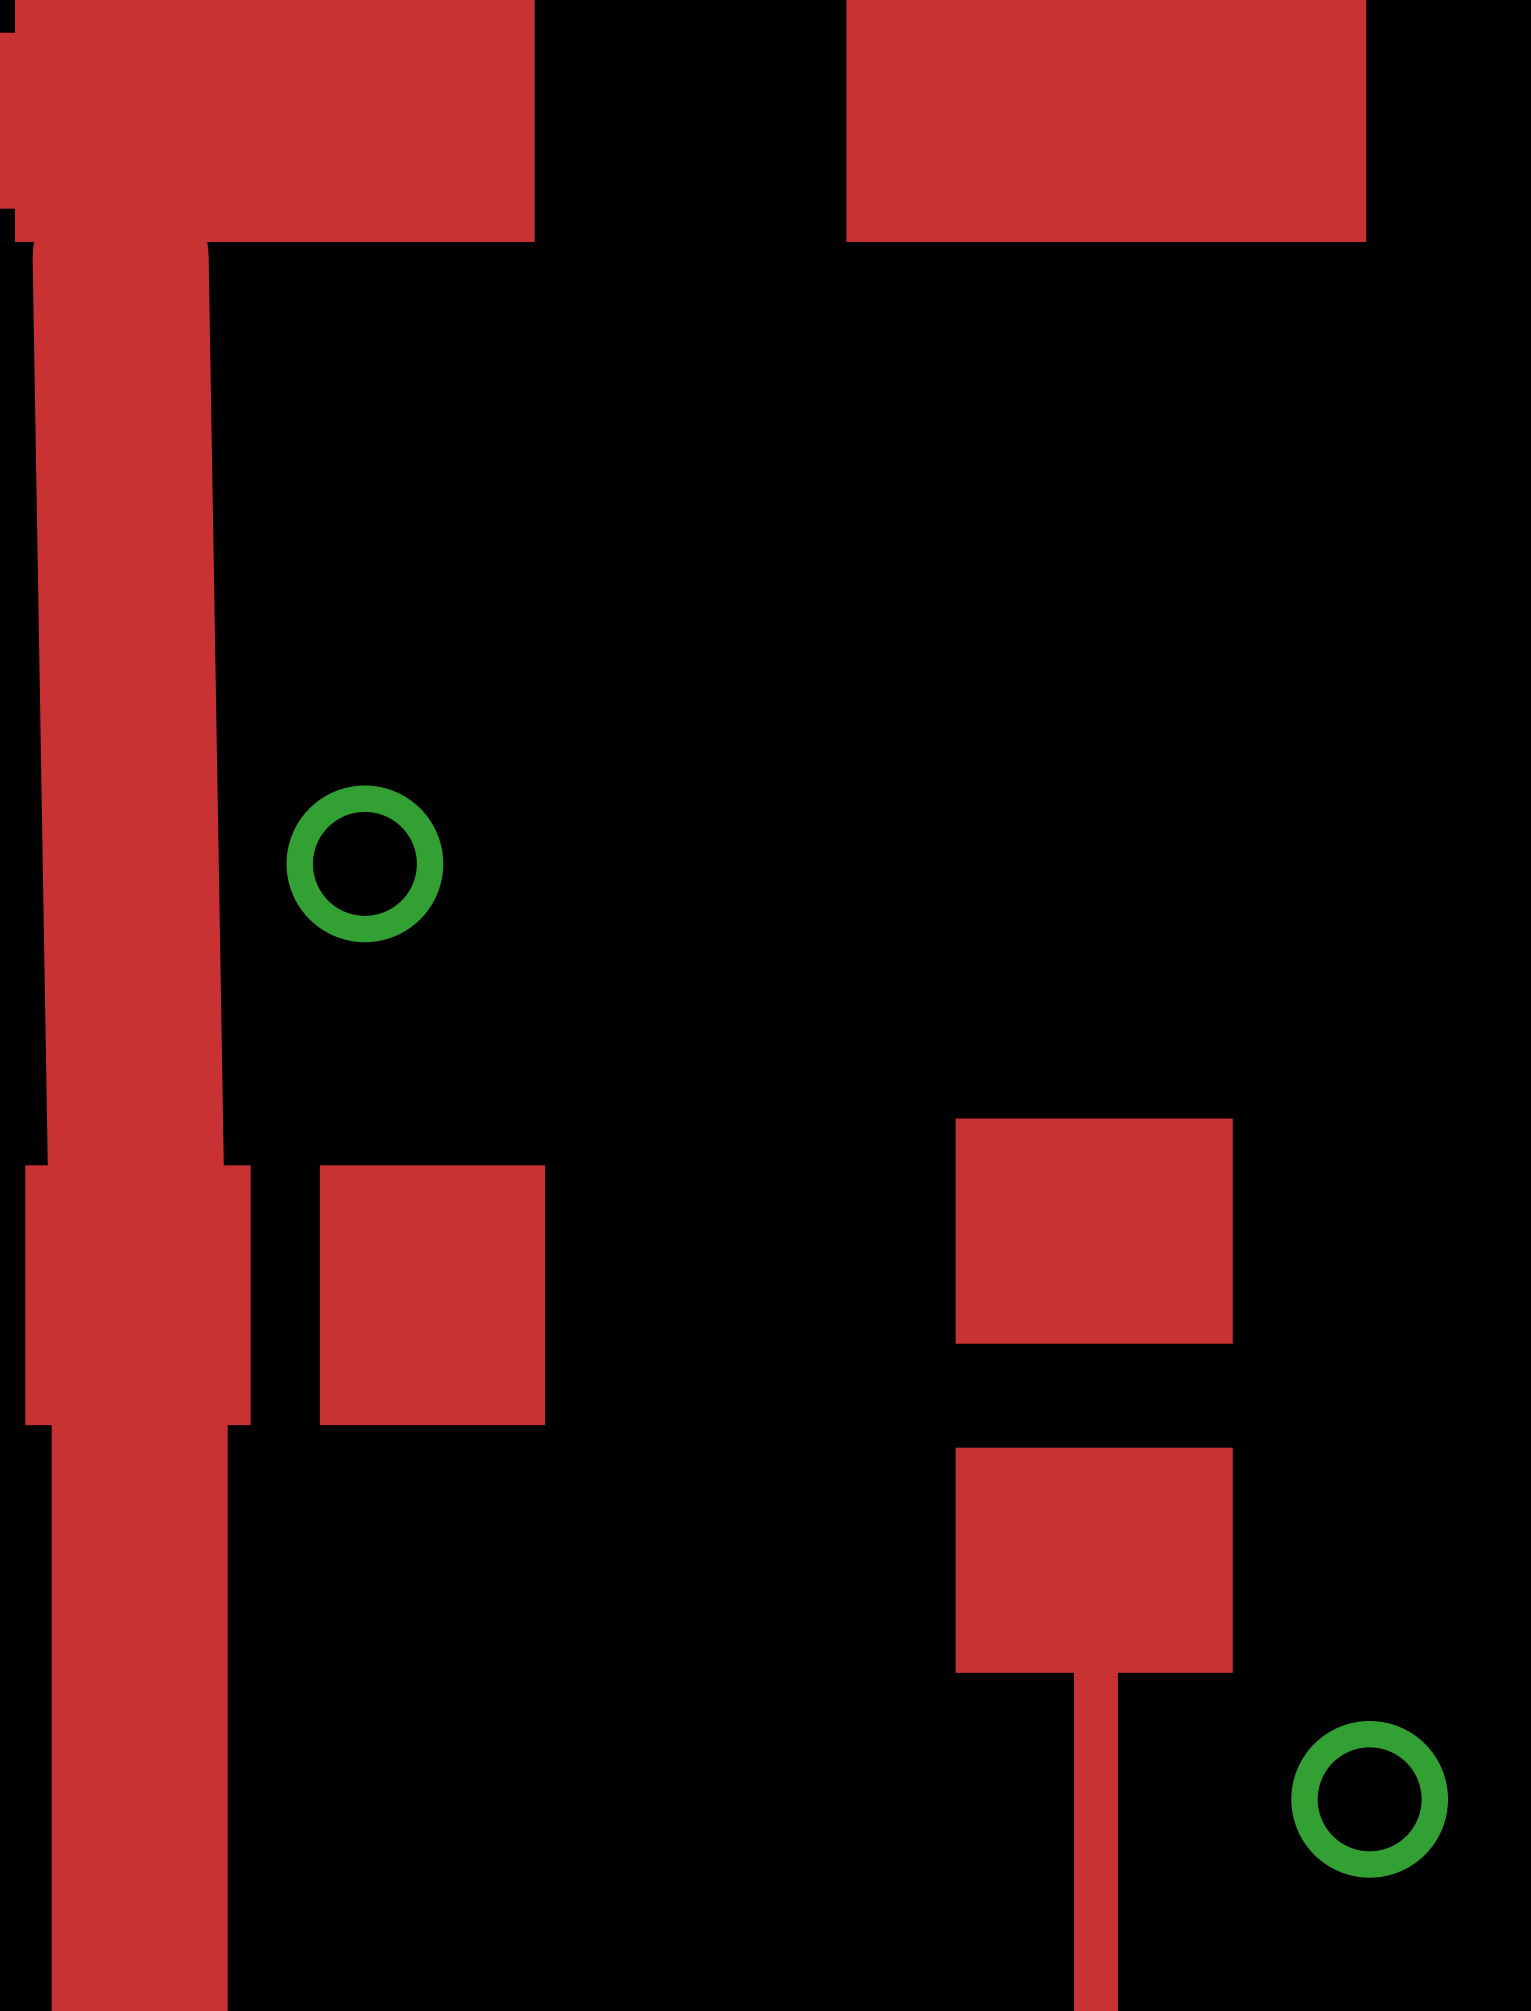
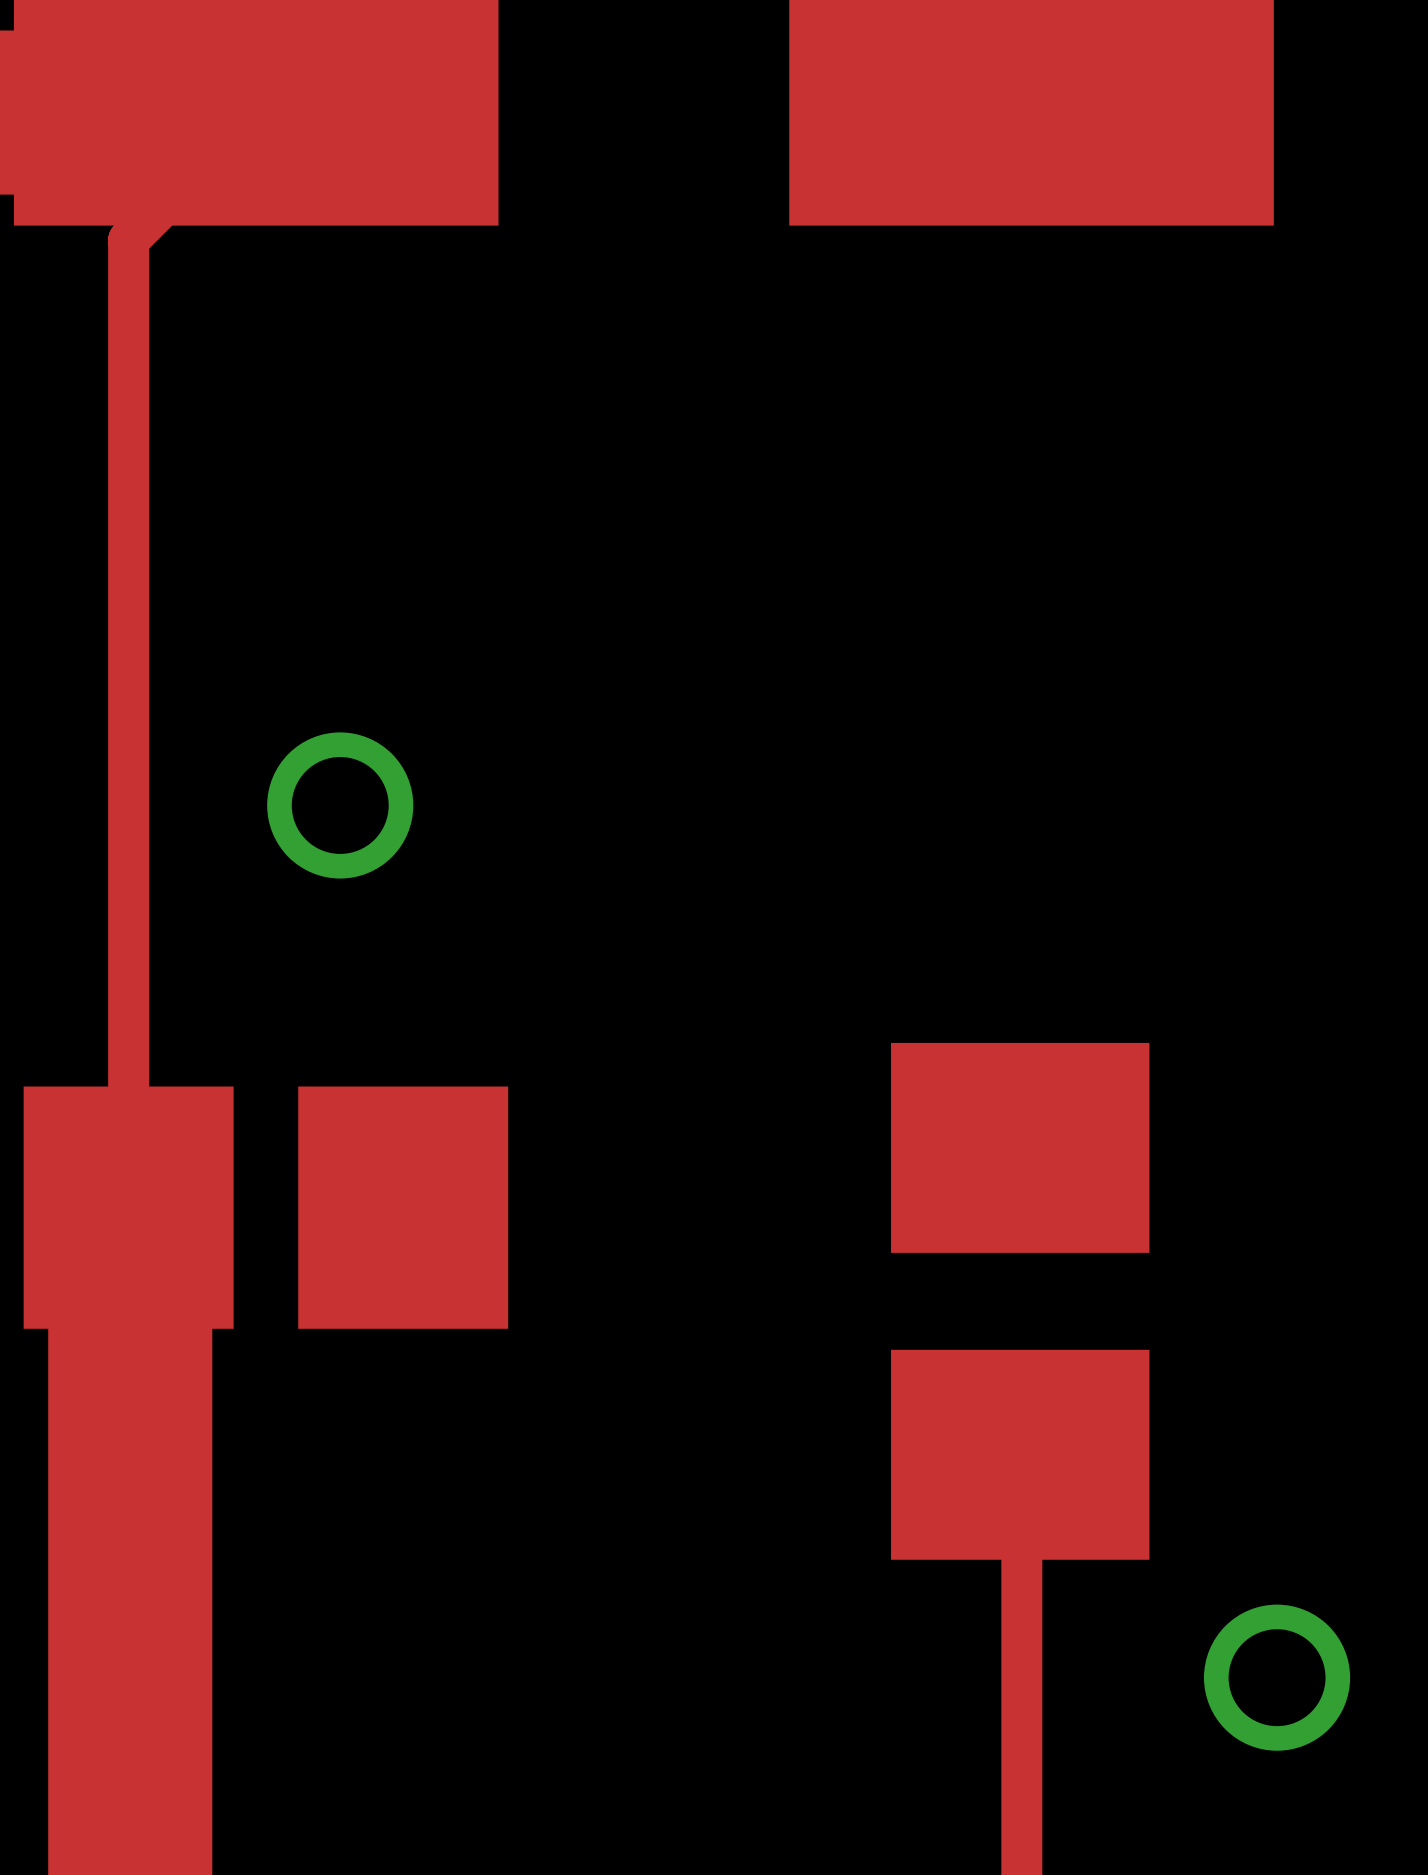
top track: (274, 120) (120, 257) (137, 1295) -> (256, 112) (128, 240) (128, 1207)

